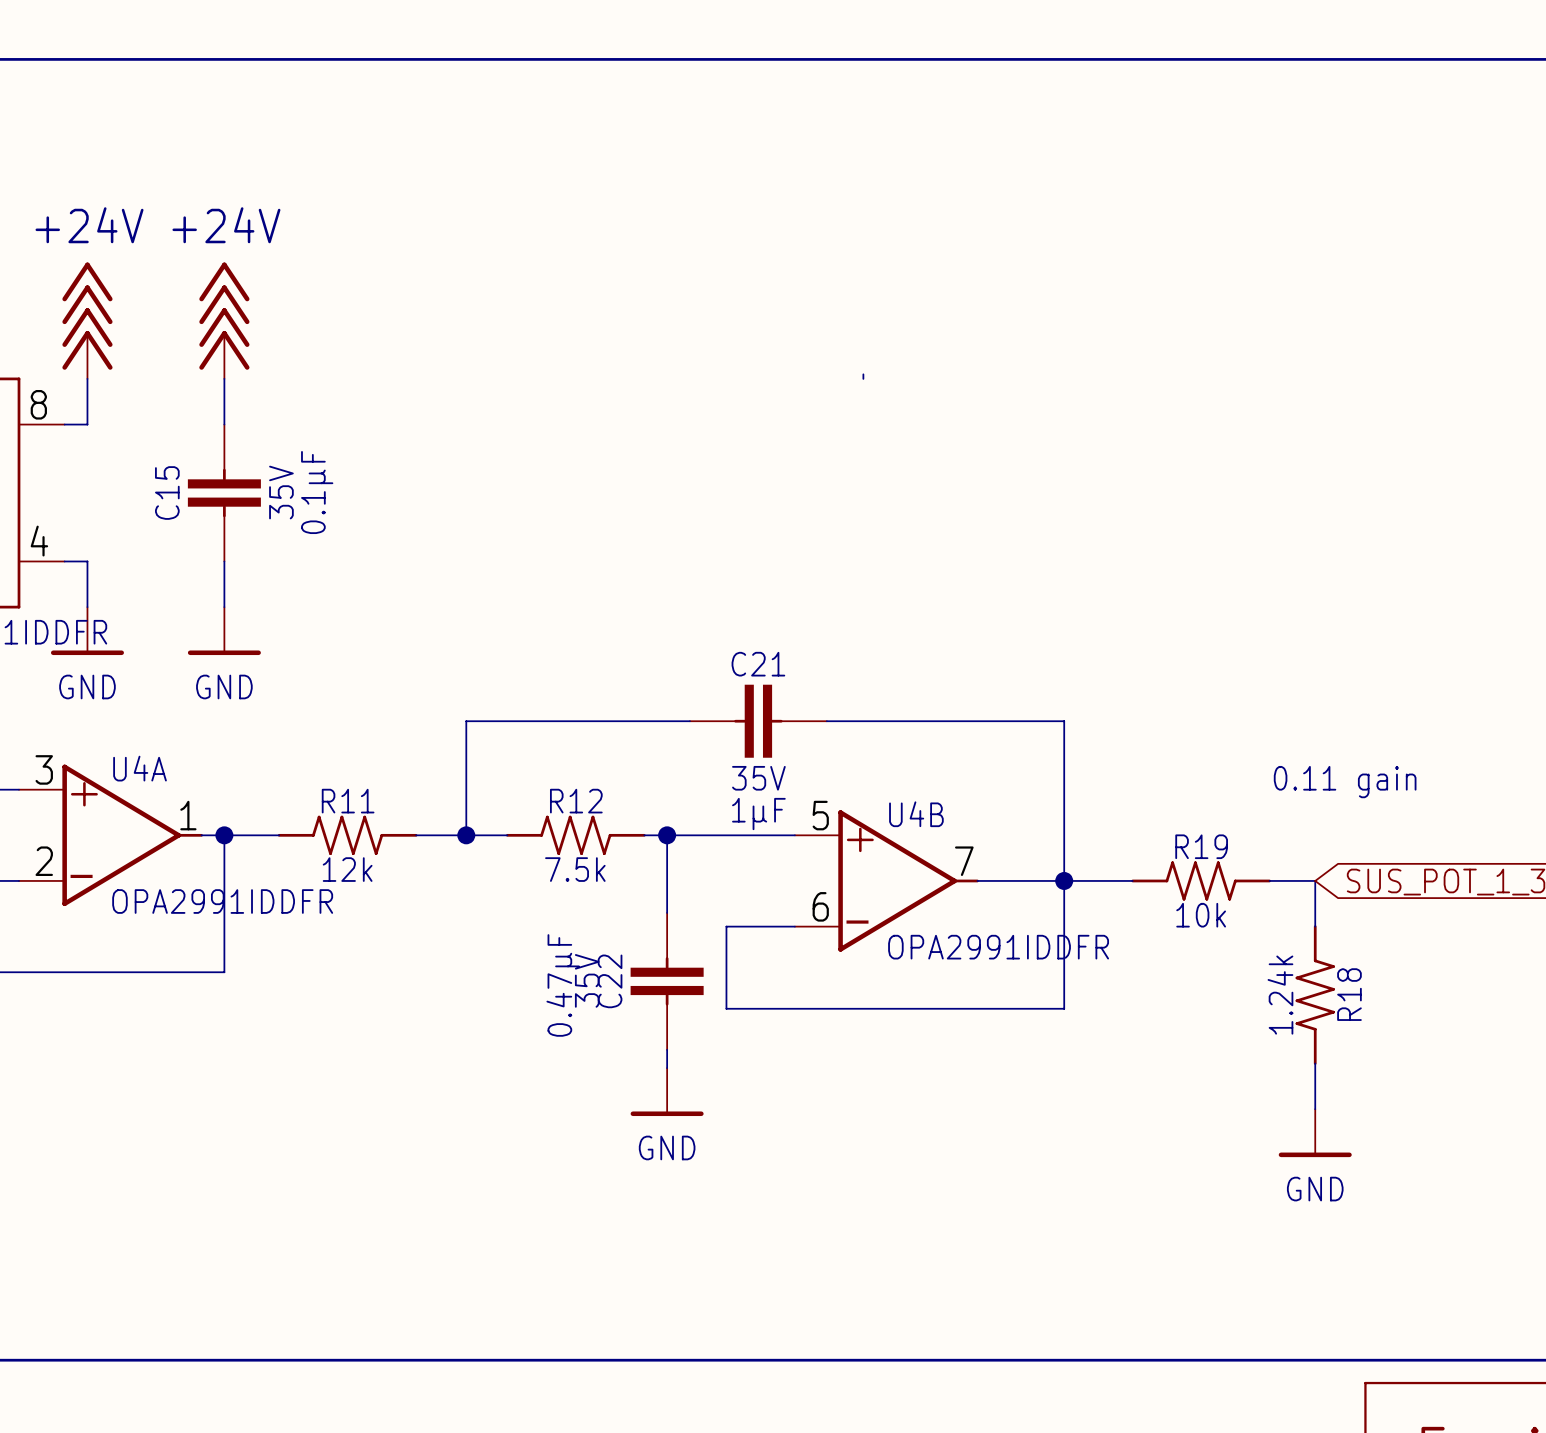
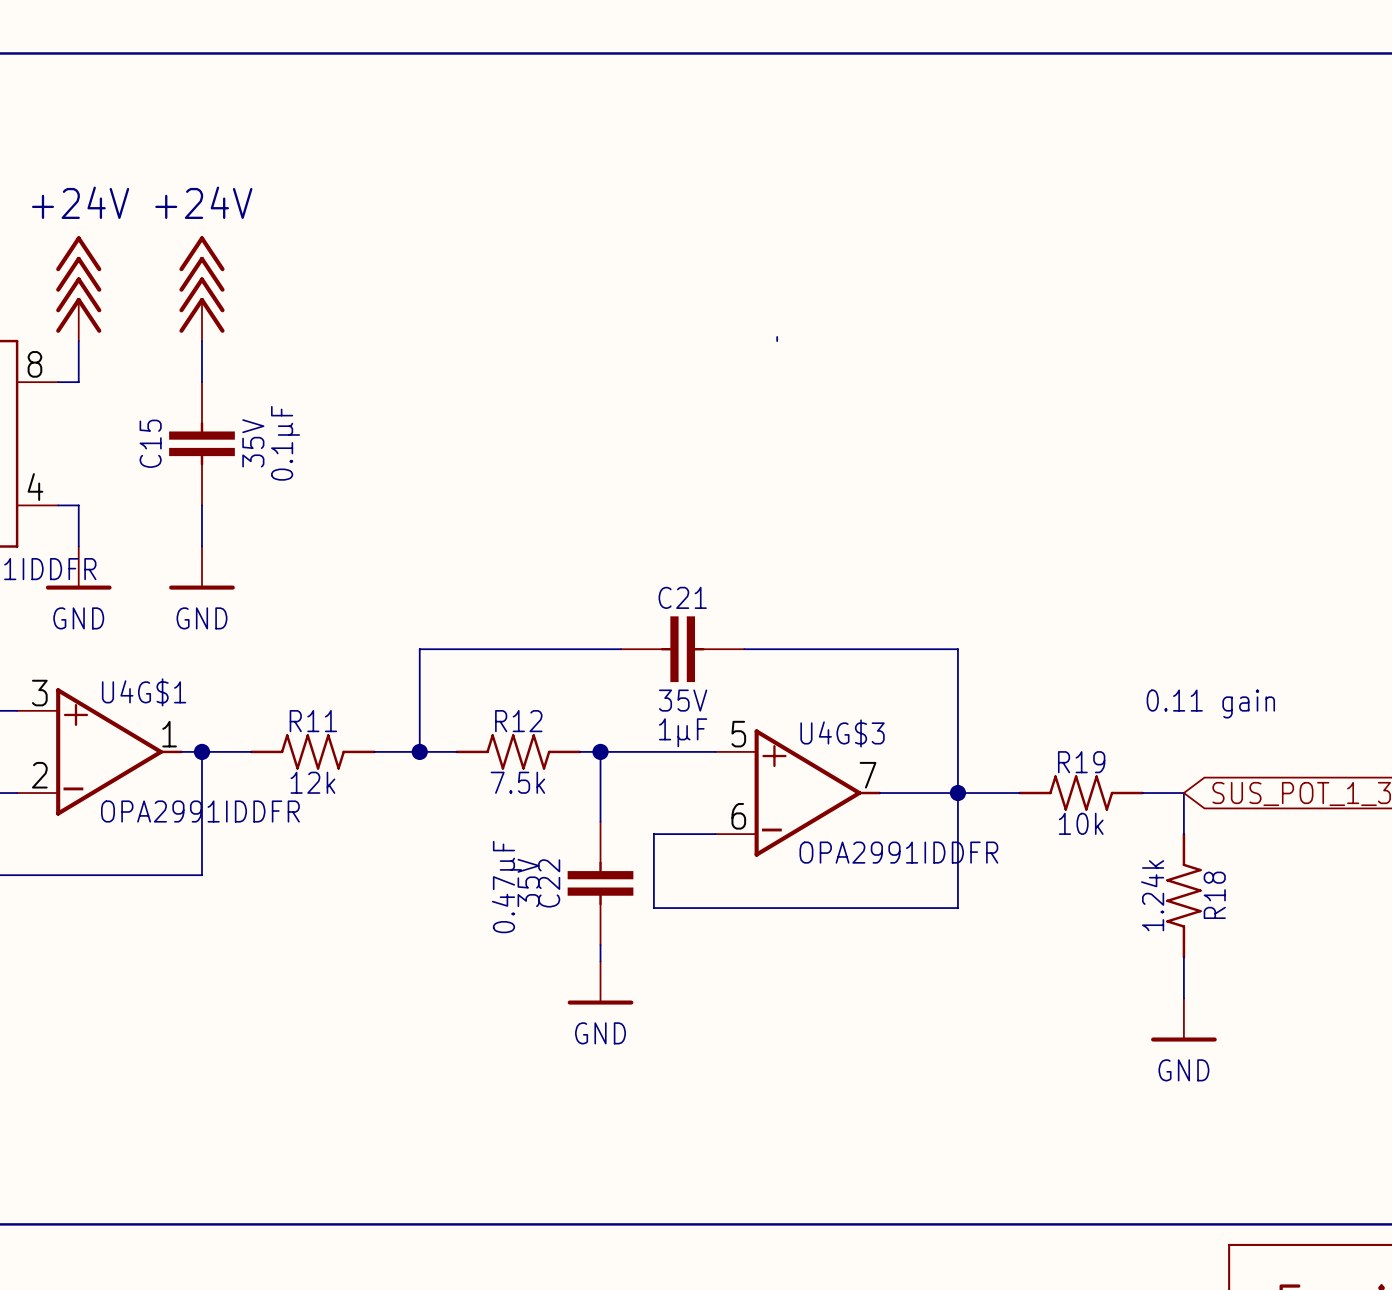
U4A name: U4A (140, 768) -> U4G$1 (144, 692)
U4B name: U4B (916, 814) -> U4G$3 (842, 733)

